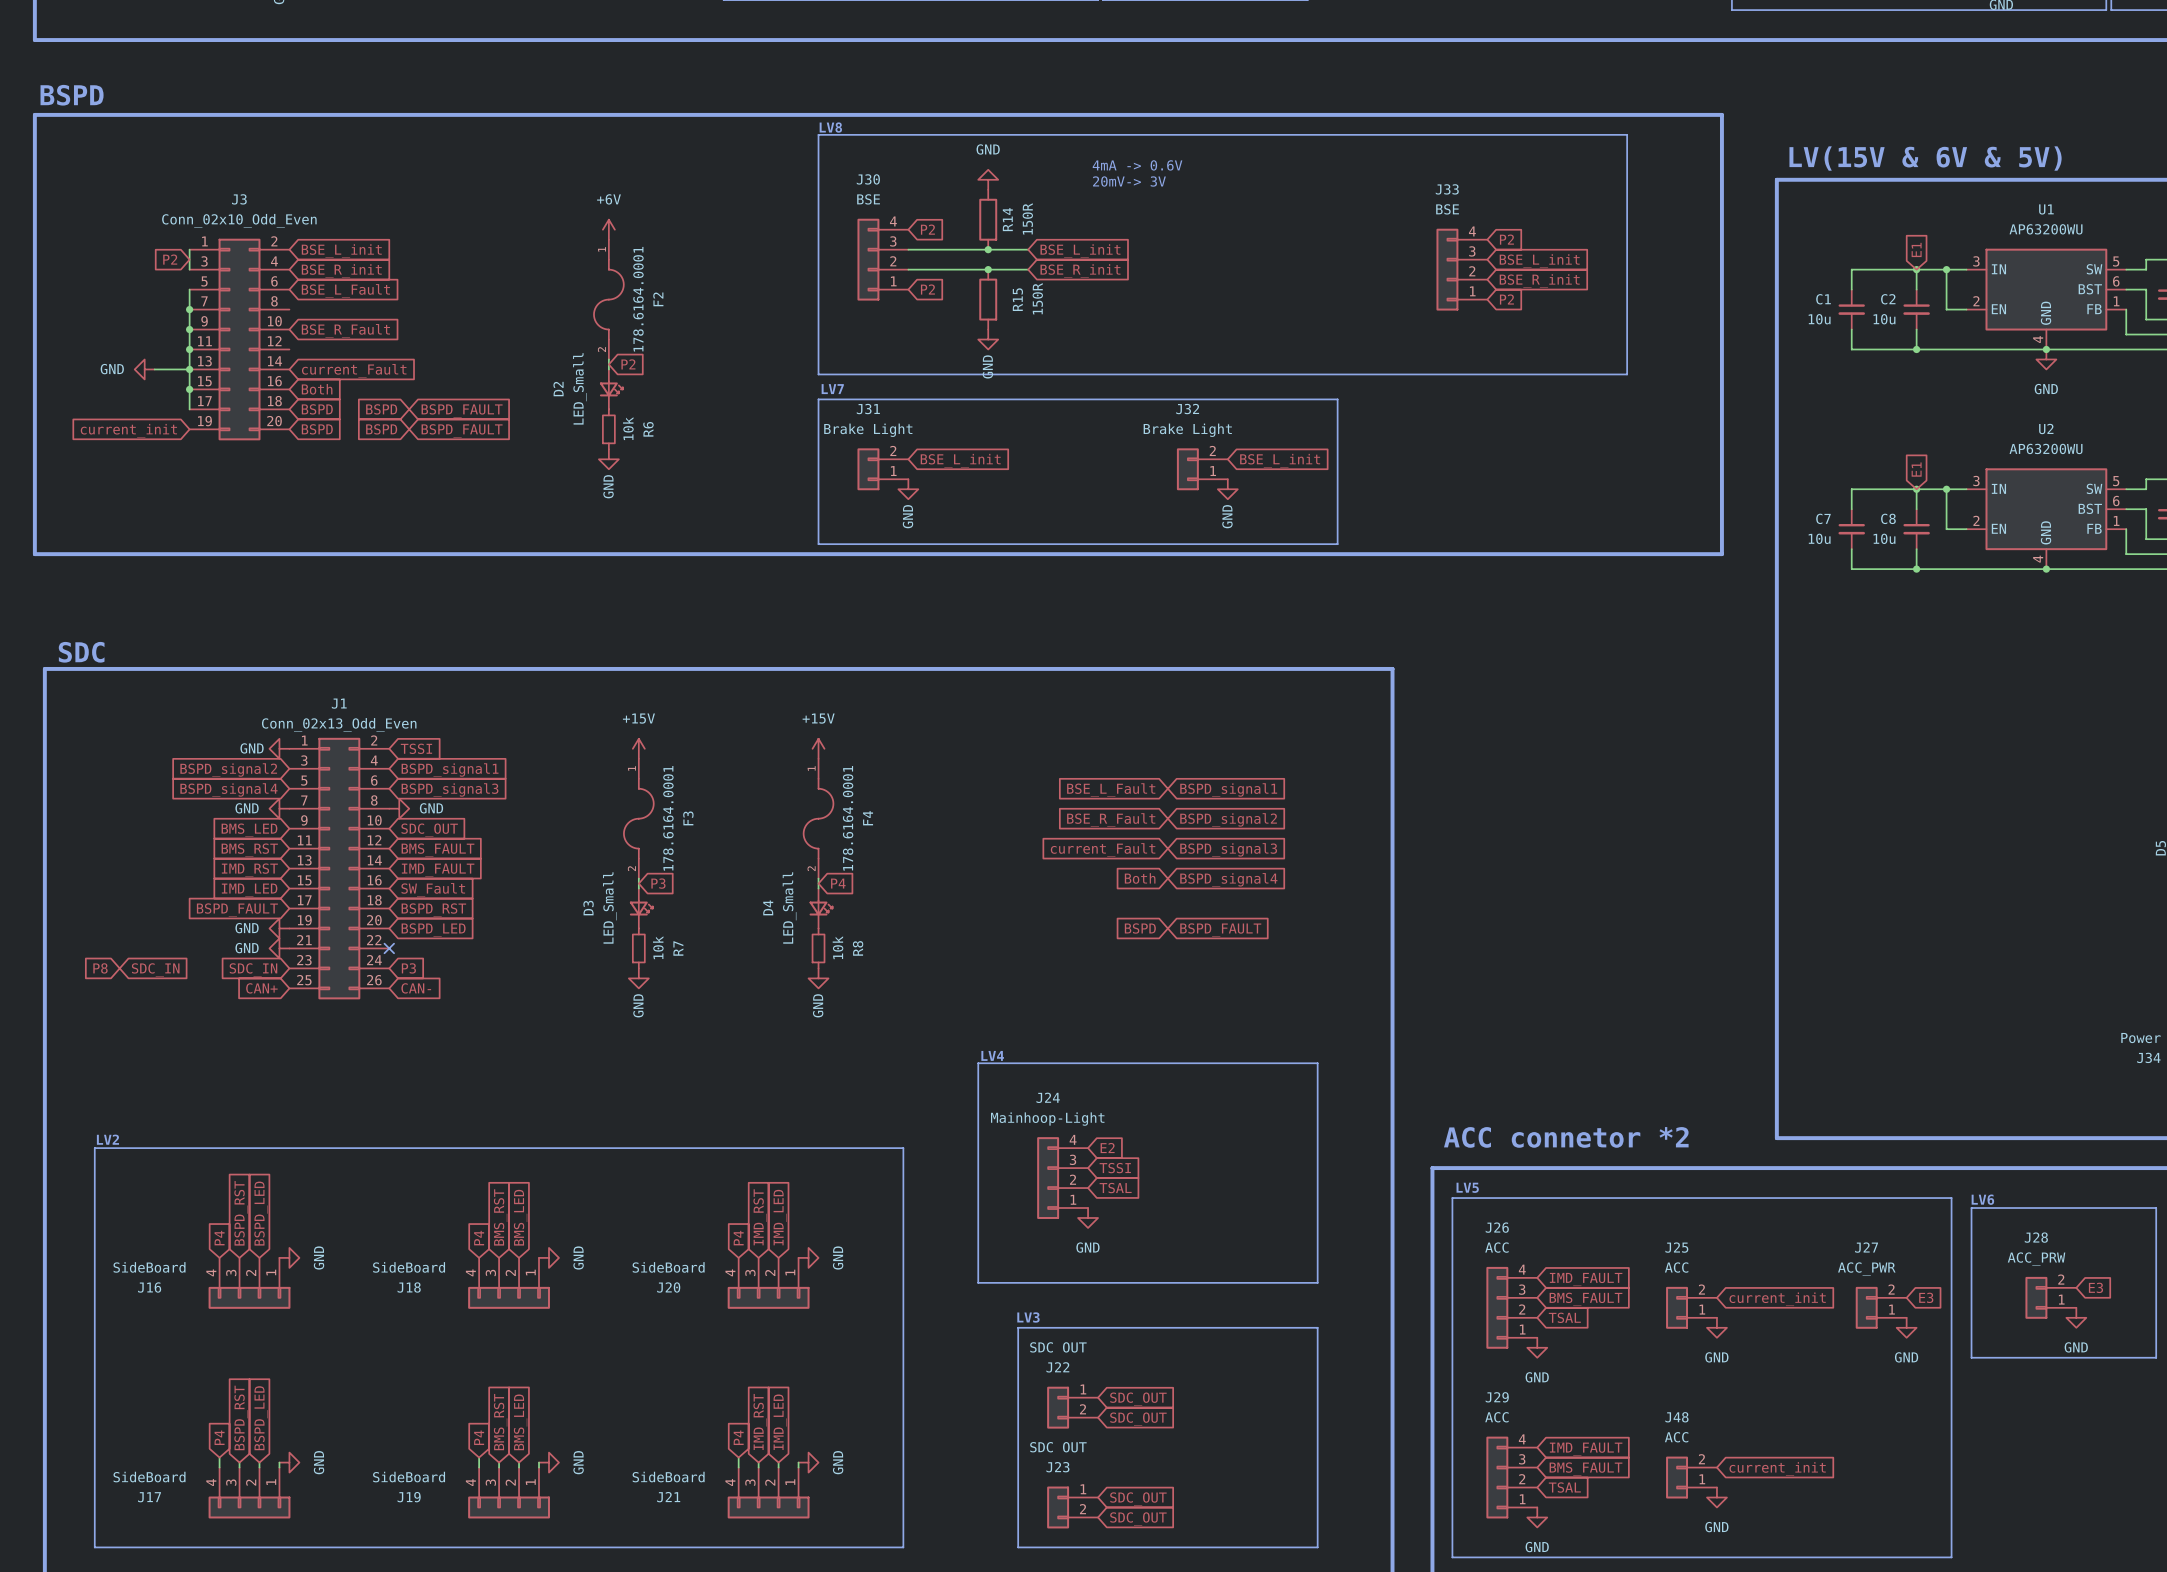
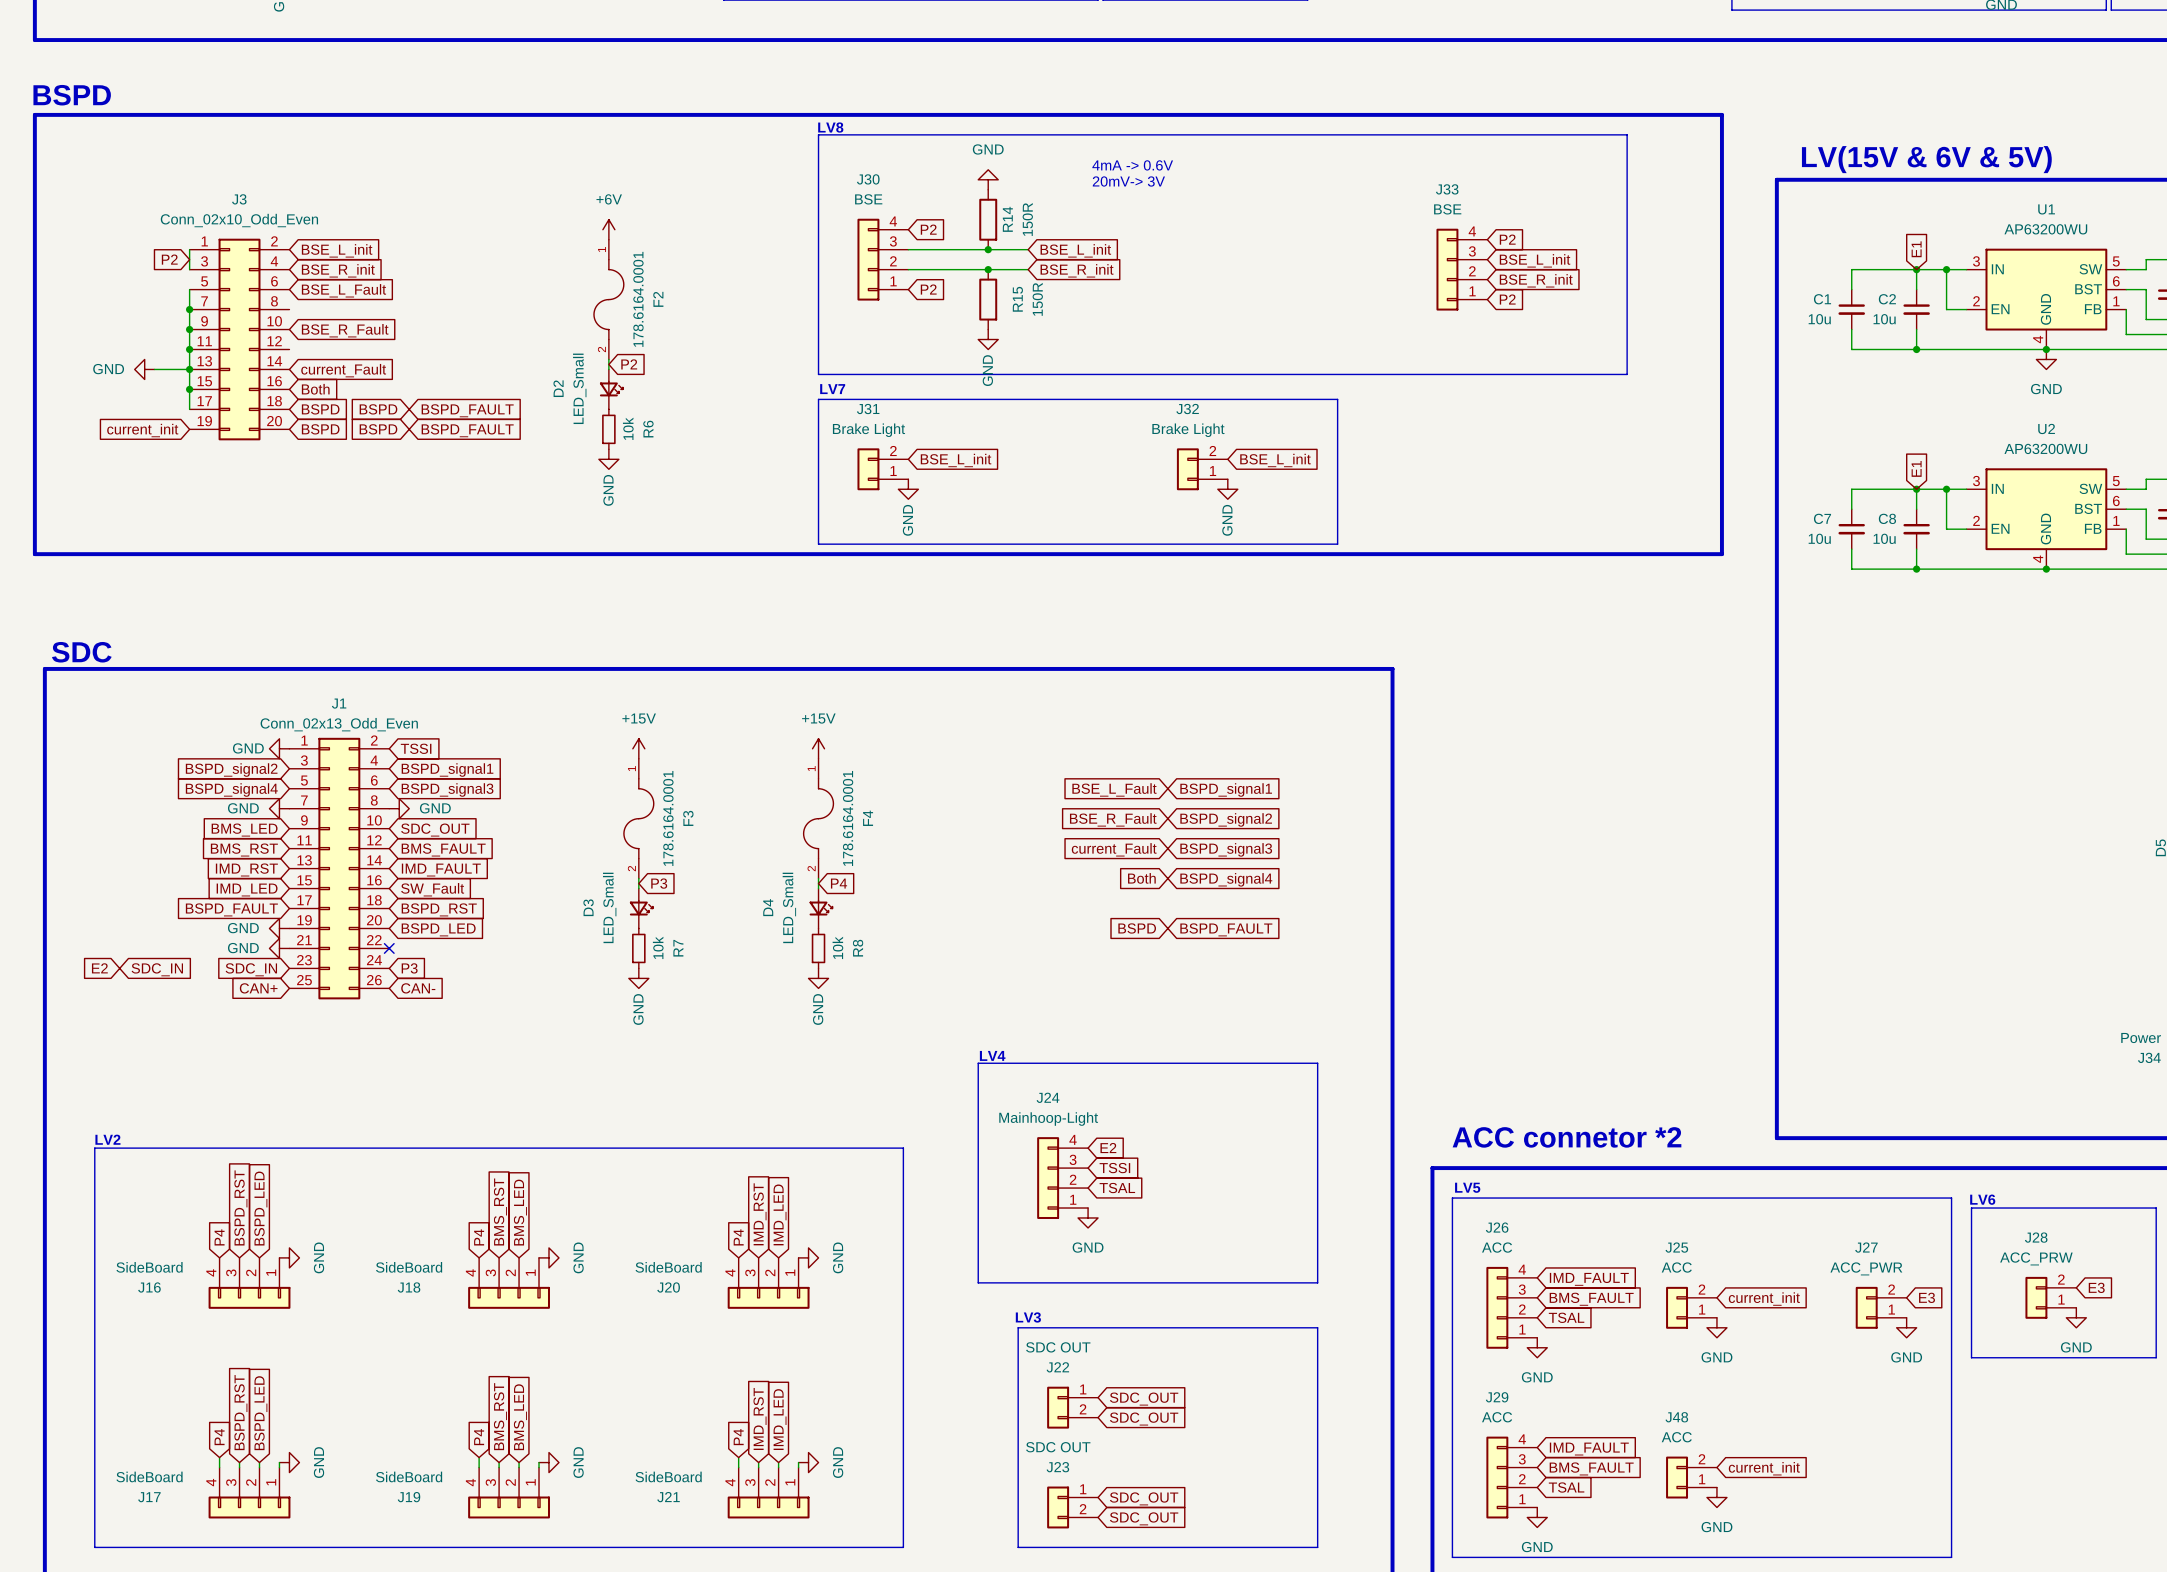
global label: P8 (100, 968) -> E2 (99, 968)

